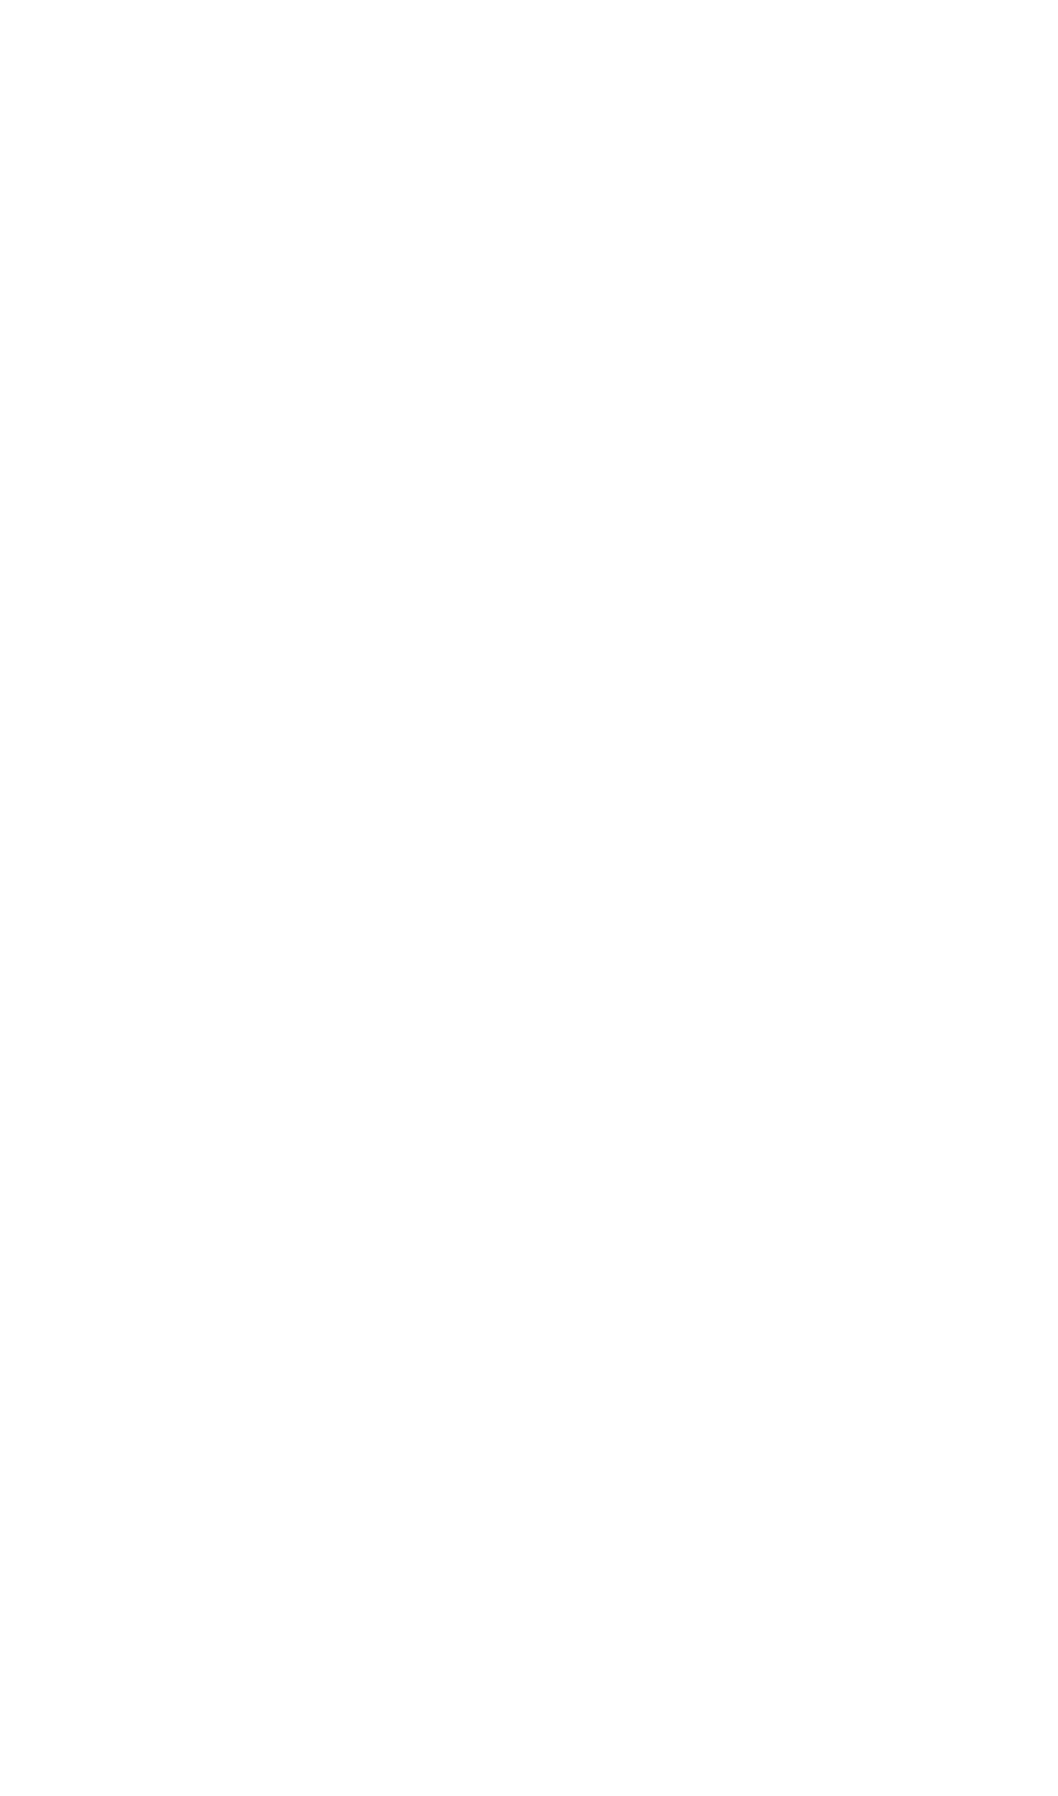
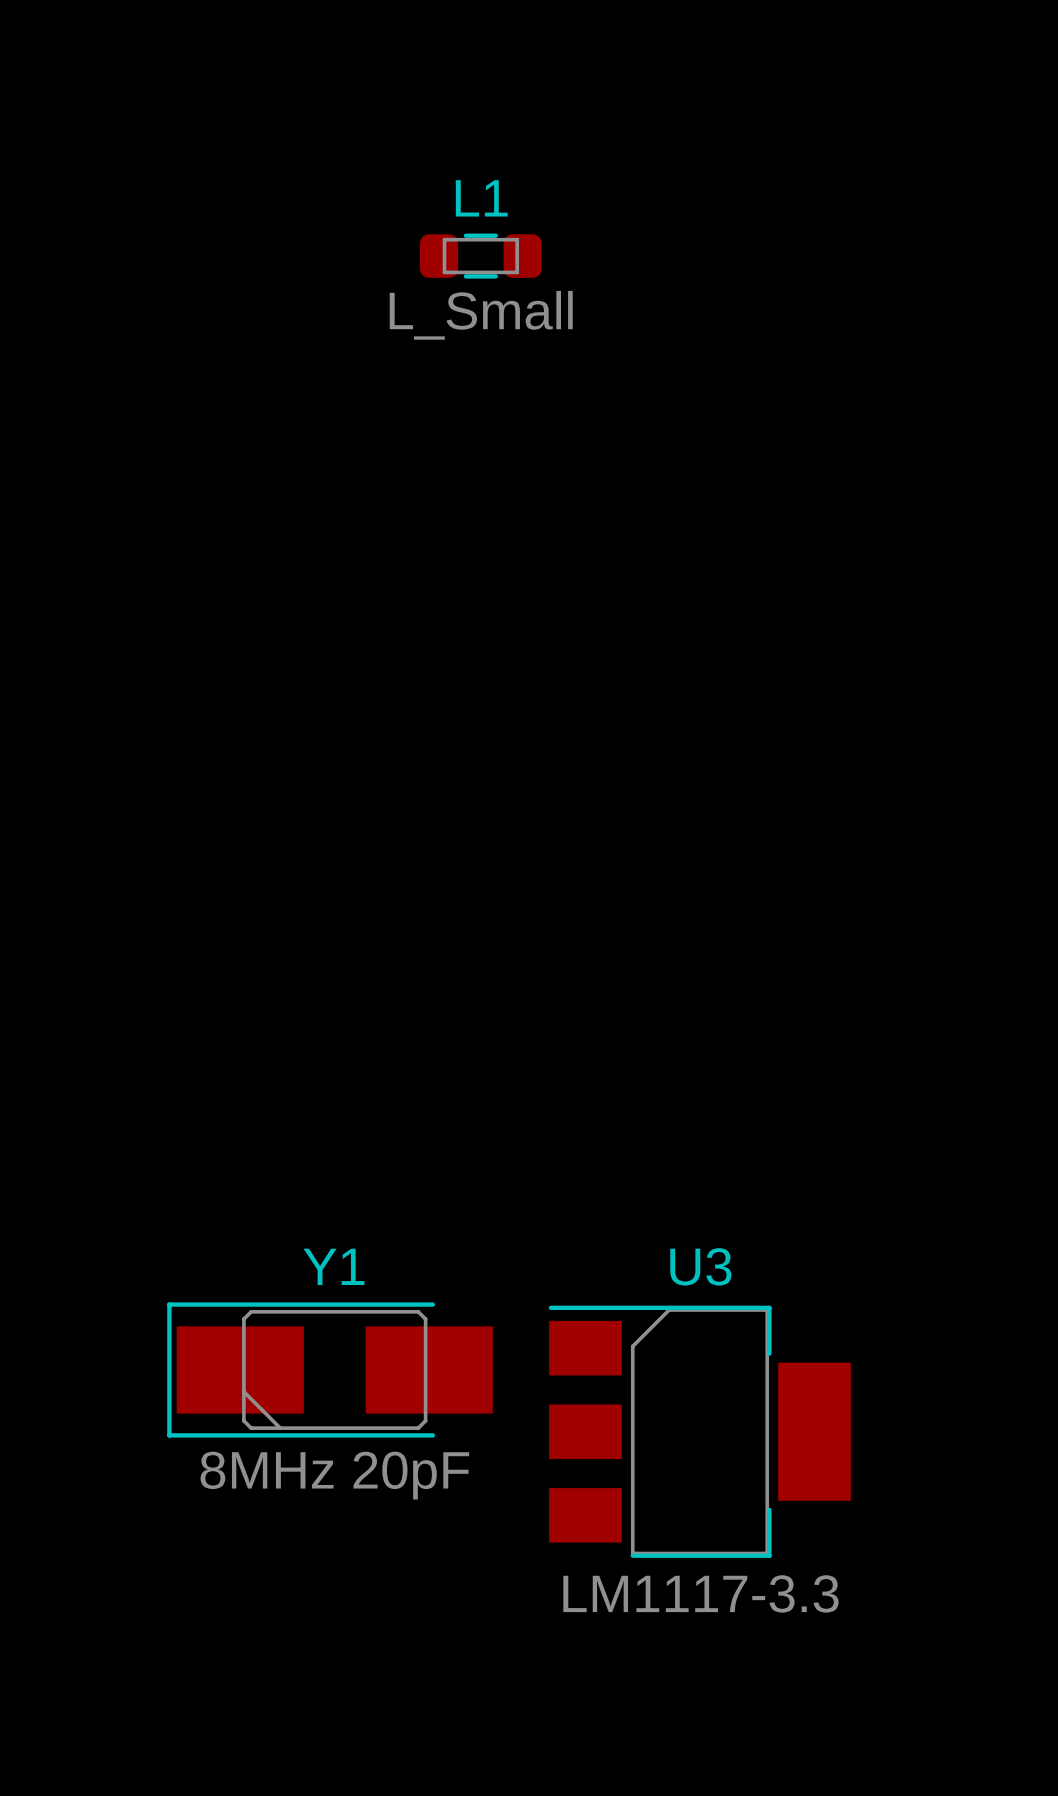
L1: none -> L_Small (480, 256)
Y1: none -> 8MHz 20pF (330, 1369)
U3: none -> LM1117-3.3 (699, 1431)

